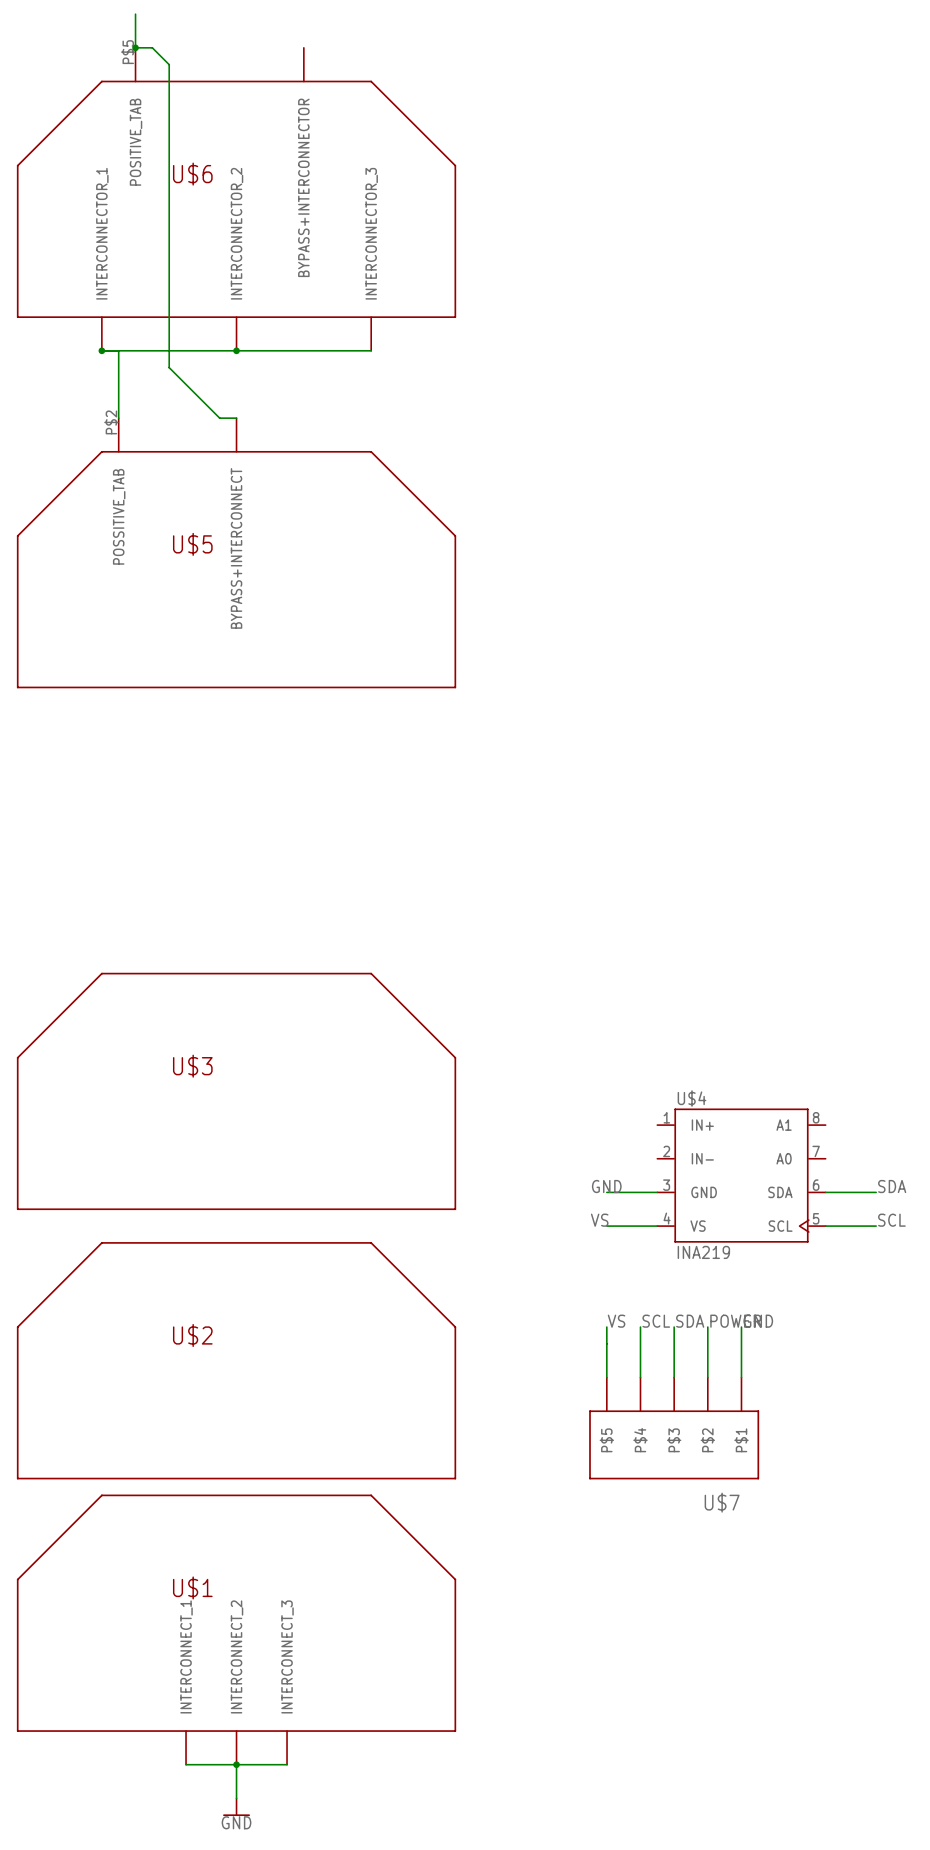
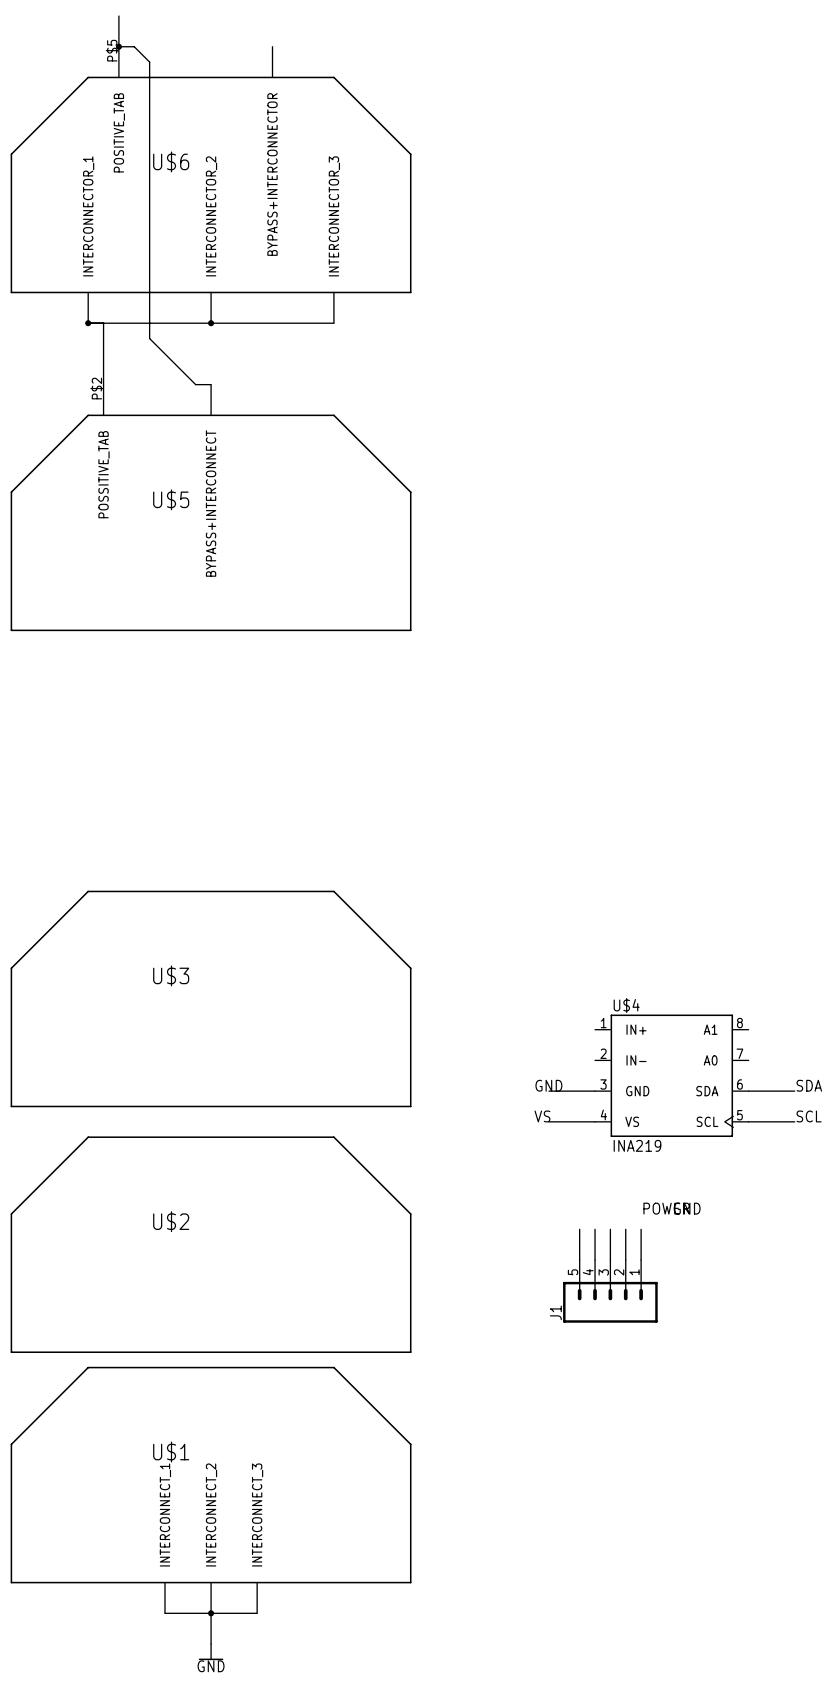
label: VS (616, 1321) -> none
label: SCL (656, 1321) -> none
label: SDA (690, 1321) -> none
wire: (606, 1327) (606, 1377) -> none
wire: (640, 1327) (640, 1343) -> none
wire: (674, 1327) (674, 1343) -> none
wire: (707, 1327) (707, 1343) -> none
wire: (741, 1327) (741, 1377) -> none
wire: none -> (595, 1229) (595, 1260)
wire: none -> (625, 1229) (625, 1260)
J1: none -> (610, 1291)
U$7: (674, 1428) -> none

